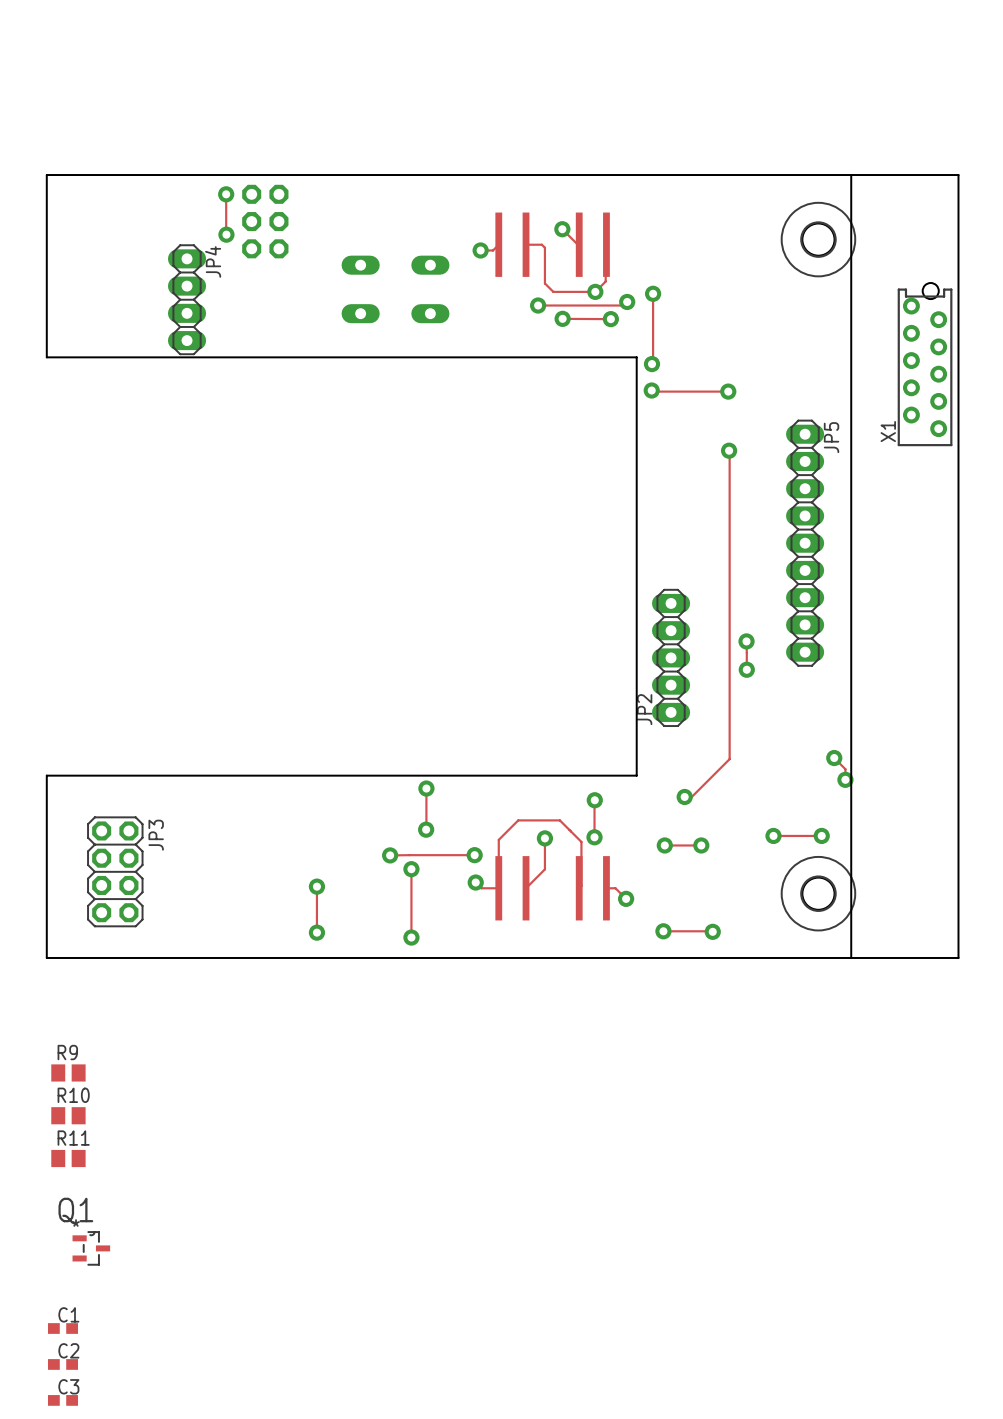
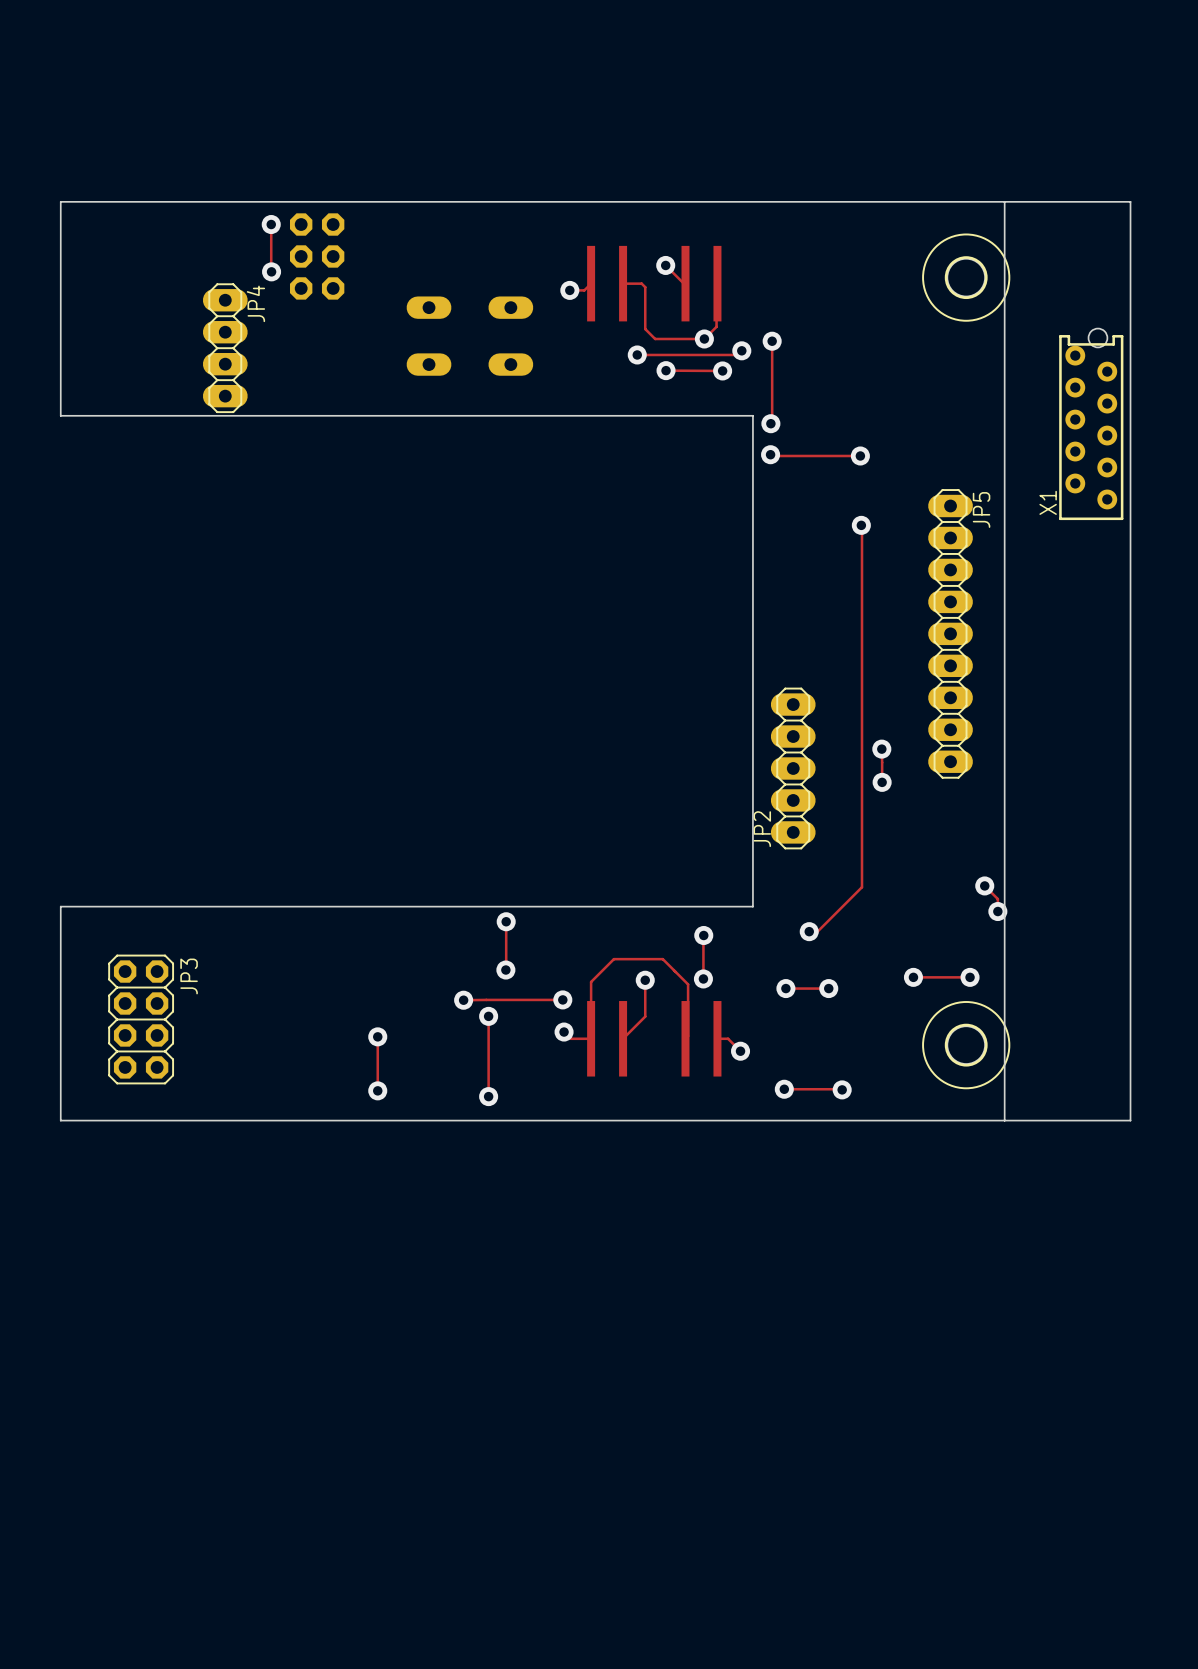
R9: (68, 1072) -> none
R10: (68, 1115) -> none
R11: (68, 1158) -> none
Q1: (91, 1248) -> none
C1: (62, 1328) -> none
C2: (62, 1364) -> none
C3: (62, 1400) -> none

